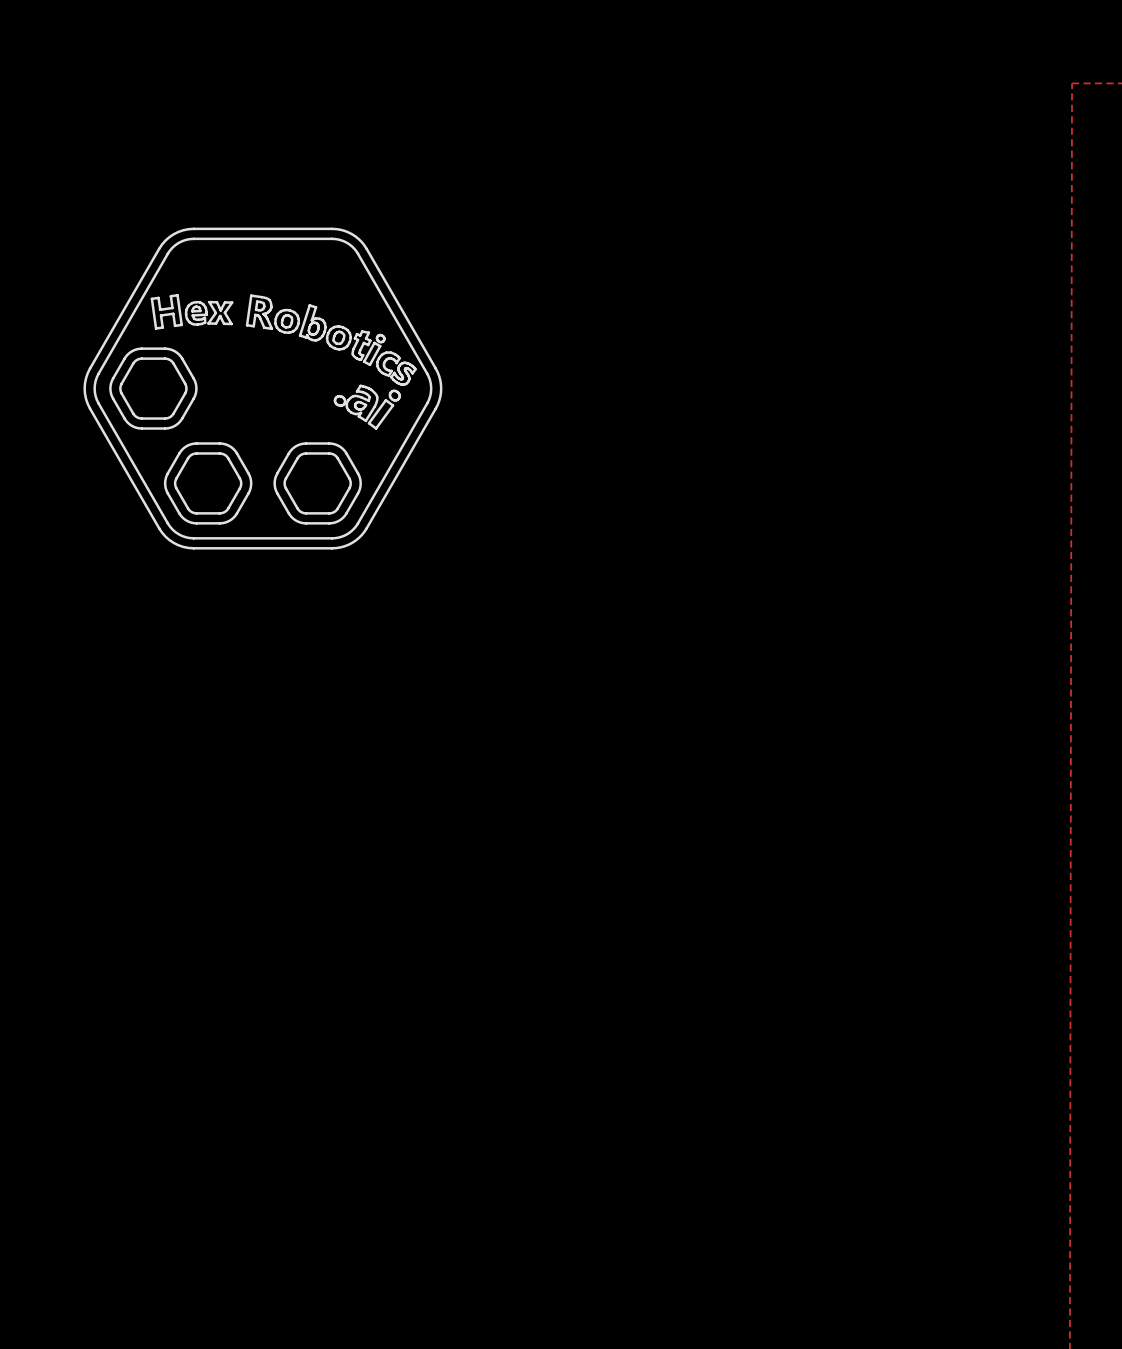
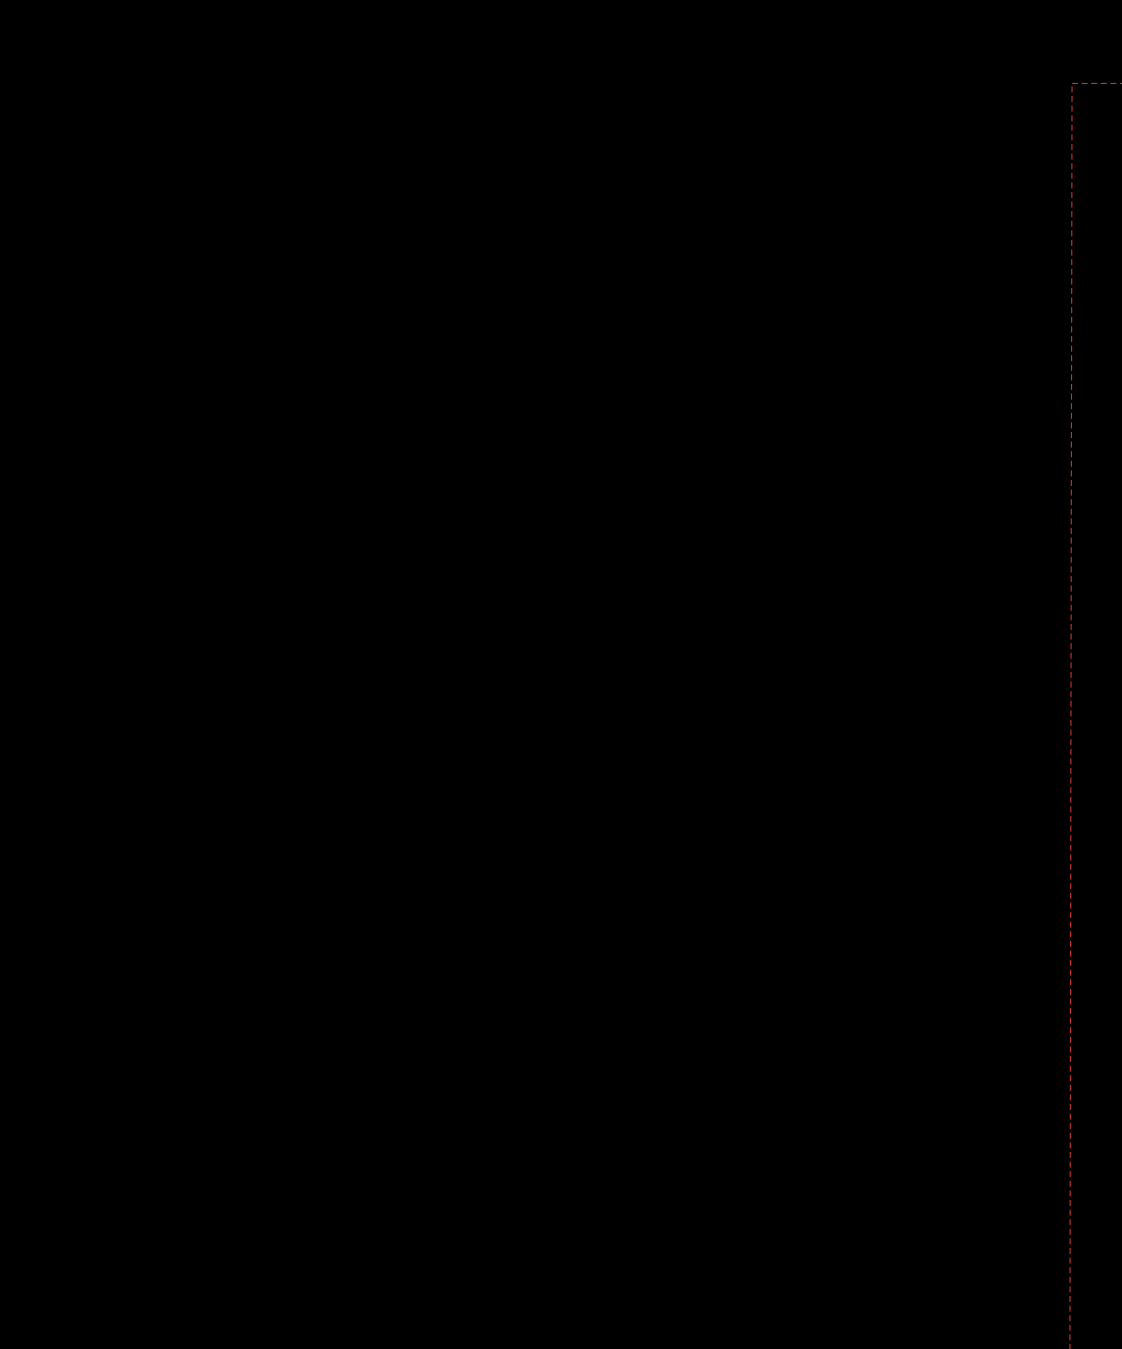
line: (193, 228) (332, 228) (352, 234) (366, 248) (437, 372) (441, 388) (435, 408) (366, 528) (358, 538) (348, 544) (332, 548) (193, 548) (173, 542) (159, 528) (87, 403) (84, 388) (87, 373) (159, 248) (173, 234) (193, 228) -> none
line: (193, 238) (332, 238) (347, 242) (358, 253) (427, 373) (431, 388) (428, 400) (358, 523) (347, 534) (332, 538) (193, 538) (178, 534) (167, 523) (98, 403) (94, 388) (98, 373) (169, 250) (182, 241) (193, 238) -> none
line: (177, 295) (170, 296) (172, 308) (160, 309) (158, 297) (151, 298) (156, 328) (162, 327) (161, 315) (173, 313) (175, 325) (181, 324) (177, 295) -> none
line: (257, 301) (256, 309) (262, 309) (263, 303) (257, 301) -> none
line: (196, 302) (187, 307) (186, 317) (192, 323) (201, 323) (205, 322) (204, 317) (196, 319) (192, 315) (206, 314) (206, 309) (202, 303) (196, 302) -> none
line: (209, 302) (216, 302) (220, 310) (224, 302) (232, 302) (224, 312) (231, 323) (224, 323) (220, 316) (216, 323) (208, 323) (215, 312) (209, 302) -> none
line: (309, 305) (300, 335) (306, 337) (307, 335) (310, 339) (316, 340) (323, 334) (324, 323) (319, 318) (311, 320) (315, 307) (309, 305) -> none
line: (196, 306) (193, 308) (192, 311) (200, 311) (196, 306) -> none
line: (284, 310) (277, 314) (275, 324) (280, 330) (289, 332) (296, 327) (298, 318) (293, 312) (284, 310) -> none
line: (263, 314) (270, 309) (269, 300) (251, 295) (247, 325) (253, 326) (255, 314) (257, 315) -> none
line: (263, 314) (271, 328) (264, 327) (259, 316) -> none
line: (286, 315) (290, 316) (292, 320) (290, 326) (285, 327) (282, 322) (286, 315) -> none
line: (313, 322) (317, 324) (318, 328) (315, 333) (311, 334) (309, 328) (313, 322) -> none
line: (338, 326) (330, 329) (327, 338) (330, 346) (339, 349) (347, 345) (350, 337) (347, 329) (338, 326) -> none
line: (339, 331) (333, 338) (336, 343) (341, 343) (344, 337) (343, 334) (339, 331) -> none
line: (362, 331) (360, 335) (357, 334) (354, 338) (358, 340) (352, 352) (354, 357) (361, 359) (363, 355) (359, 353) (360, 350) (363, 342) (368, 345) (370, 340) (366, 338) (368, 332) (362, 331) -> none
line: (379, 335) (377, 339) (381, 342) (384, 337) (379, 335) -> none
line: (374, 342) (364, 361) (369, 364) (380, 346) (374, 342) -> none
line: (141, 348) (167, 348) (174, 351) (180, 356) (194, 380) (196, 388) (194, 396) (181, 420) (173, 426) (141, 428) (133, 426) (125, 420) (111, 396) (111, 383) (124, 358) (131, 351) (141, 348) -> none
line: (386, 352) (379, 358) (377, 365) (380, 371) (388, 375) (391, 370) (384, 368) (385, 361) (391, 358) (396, 363) (399, 358) (392, 353) (386, 352) -> none
line: (141, 358) (169, 359) (185, 384) (185, 392) (173, 414) (169, 417) (136, 417) (121, 392) (121, 384) (133, 363) (141, 358) -> none
line: (408, 369) (412, 373) (415, 369) (406, 363) (399, 365) (398, 370) (402, 376) -> none
line: (405, 370) (409, 378) (405, 384) (398, 383) (391, 377) (394, 372) (398, 378) (402, 378) -> none
line: (393, 390) (390, 396) (395, 400) (399, 395) (393, 390) -> none
line: (340, 396) (336, 397) (335, 401) (337, 405) (341, 405) (344, 399) (340, 396) -> none
line: (385, 400) (369, 423) (376, 428) (392, 405) (385, 400) -> none
line: (357, 402) (355, 406) (359, 409) (366, 404) (357, 402) -> none
line: (360, 412) (351, 412) (347, 408) (346, 403) (354, 395) (368, 400) (369, 397) (366, 394) (357, 391) (360, 385) (371, 389) (377, 398) (374, 406) (365, 420) (358, 416) (361, 412) -> none
line: (196, 443) (221, 443) (229, 446) (235, 451) (249, 475) (251, 483) (249, 491) (235, 515) (227, 521) (196, 523) (186, 520) (180, 515) (166, 491) (165, 478) (179, 453) (186, 446) (196, 443) -> none
line: (306, 443) (331, 443) (339, 446) (345, 451) (358, 475) (360, 483) (358, 491) (345, 515) (337, 521) (306, 523) (296, 520) (290, 515) (276, 491) (275, 478) (288, 453) (296, 446) (306, 443) -> none
line: (196, 453) (224, 454) (240, 479) (240, 487) (227, 509) (223, 512) (191, 512) (175, 487) (175, 479) (187, 458) (196, 453) -> none
line: (306, 453) (334, 454) (349, 479) (349, 487) (337, 509) (333, 512) (301, 512) (285, 487) (285, 479) (297, 458) (306, 453) -> none

